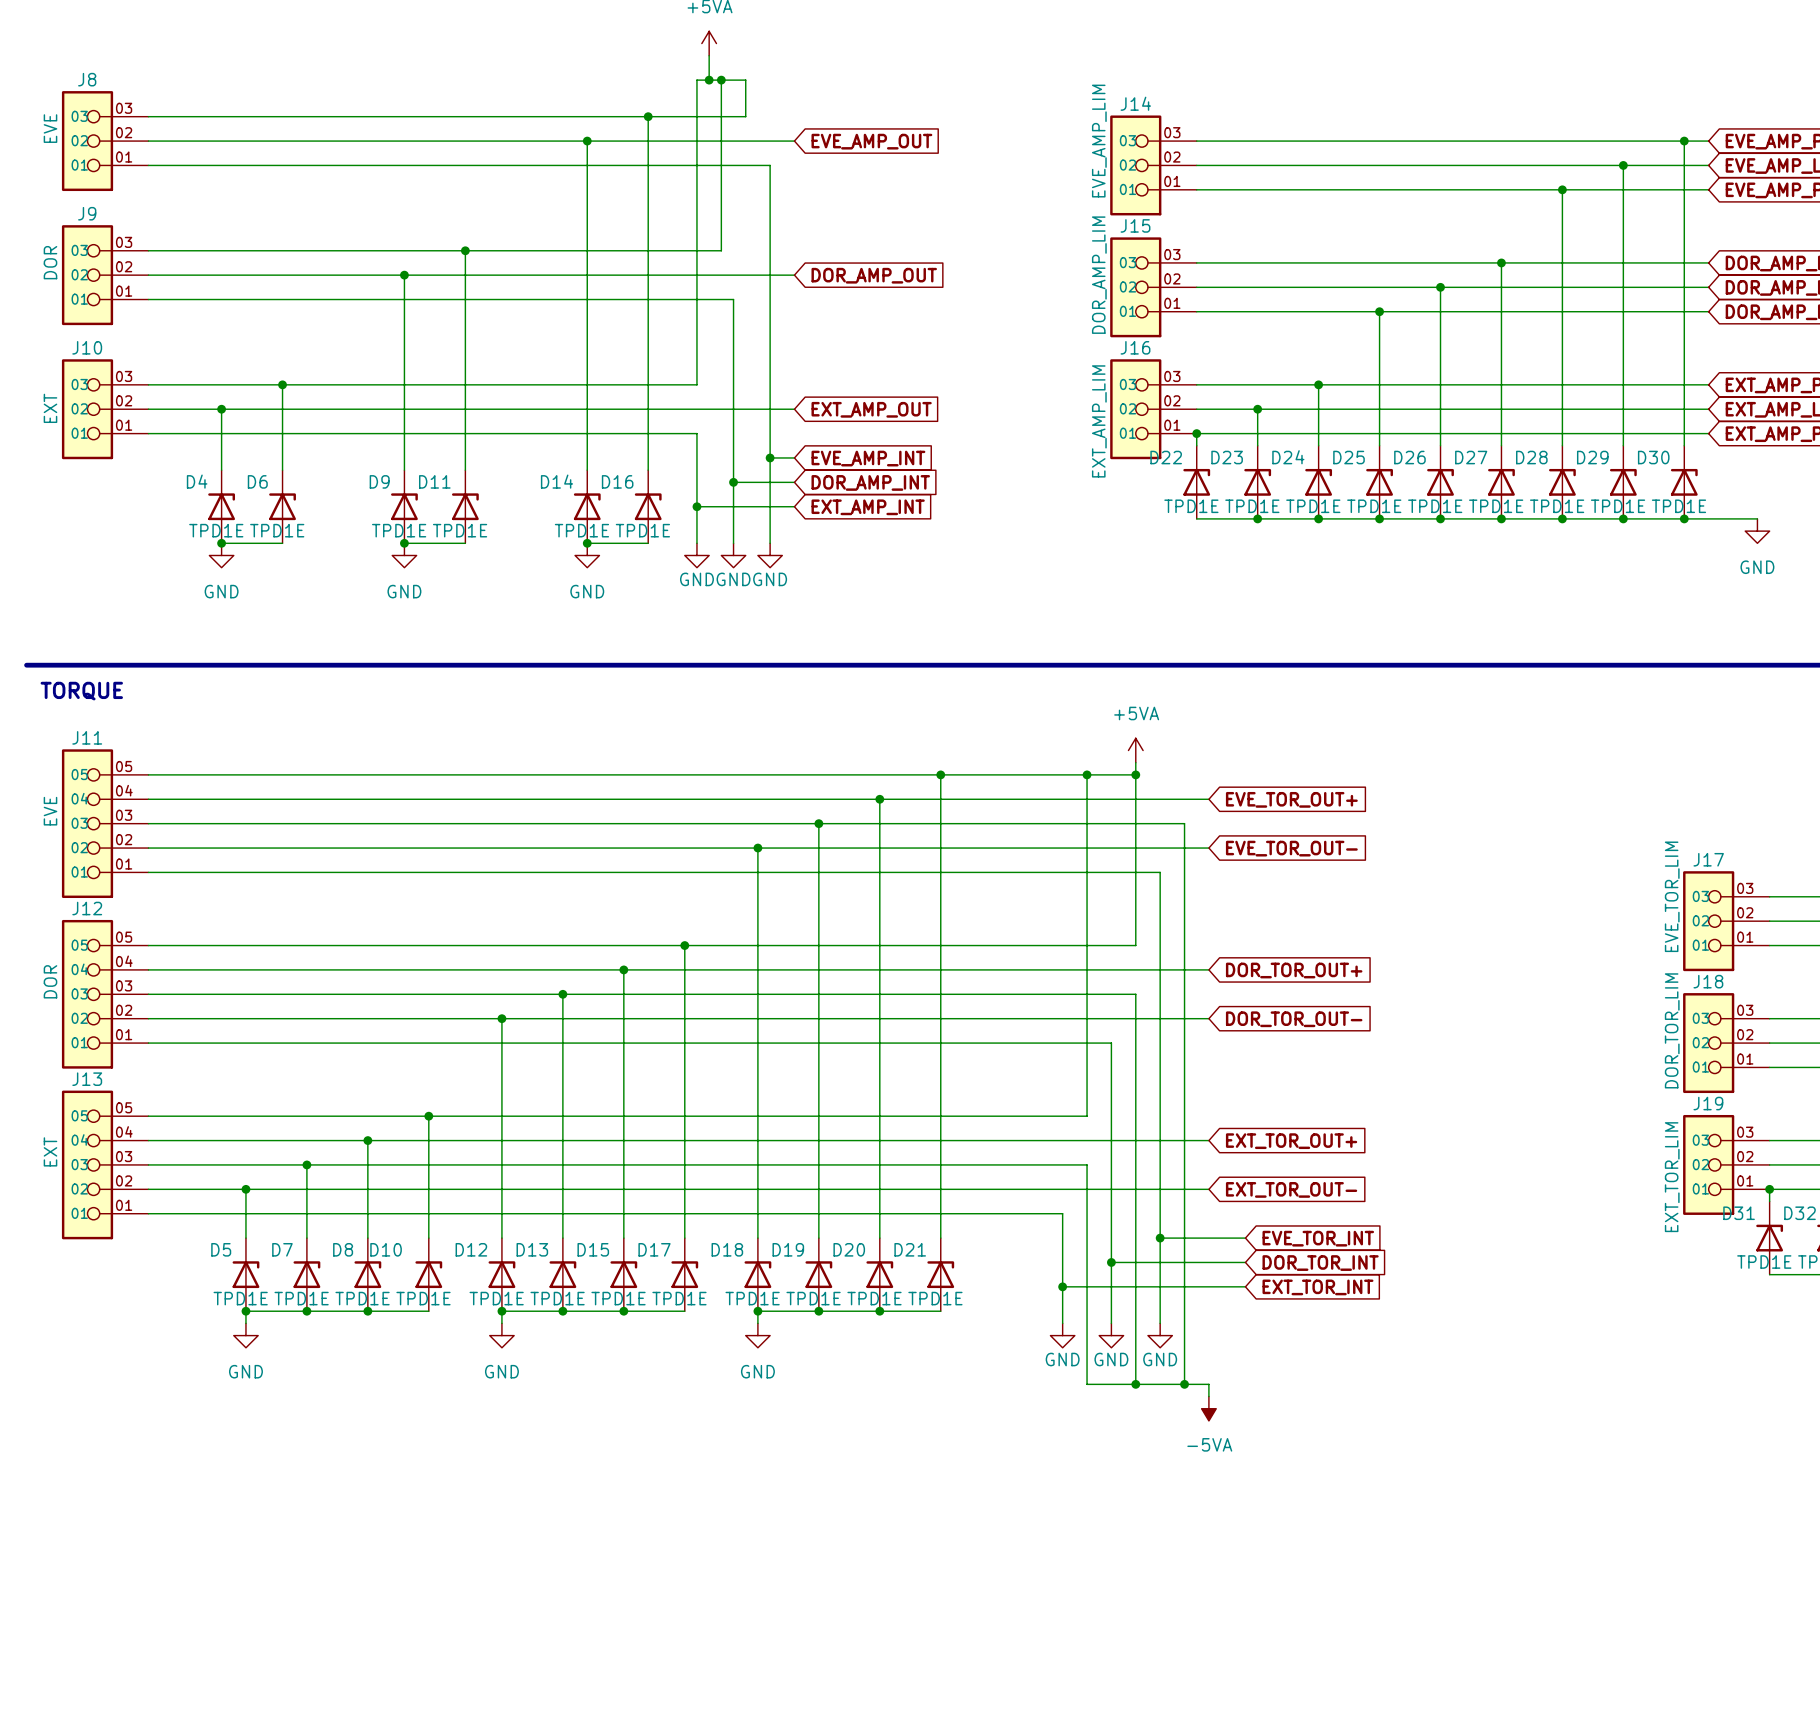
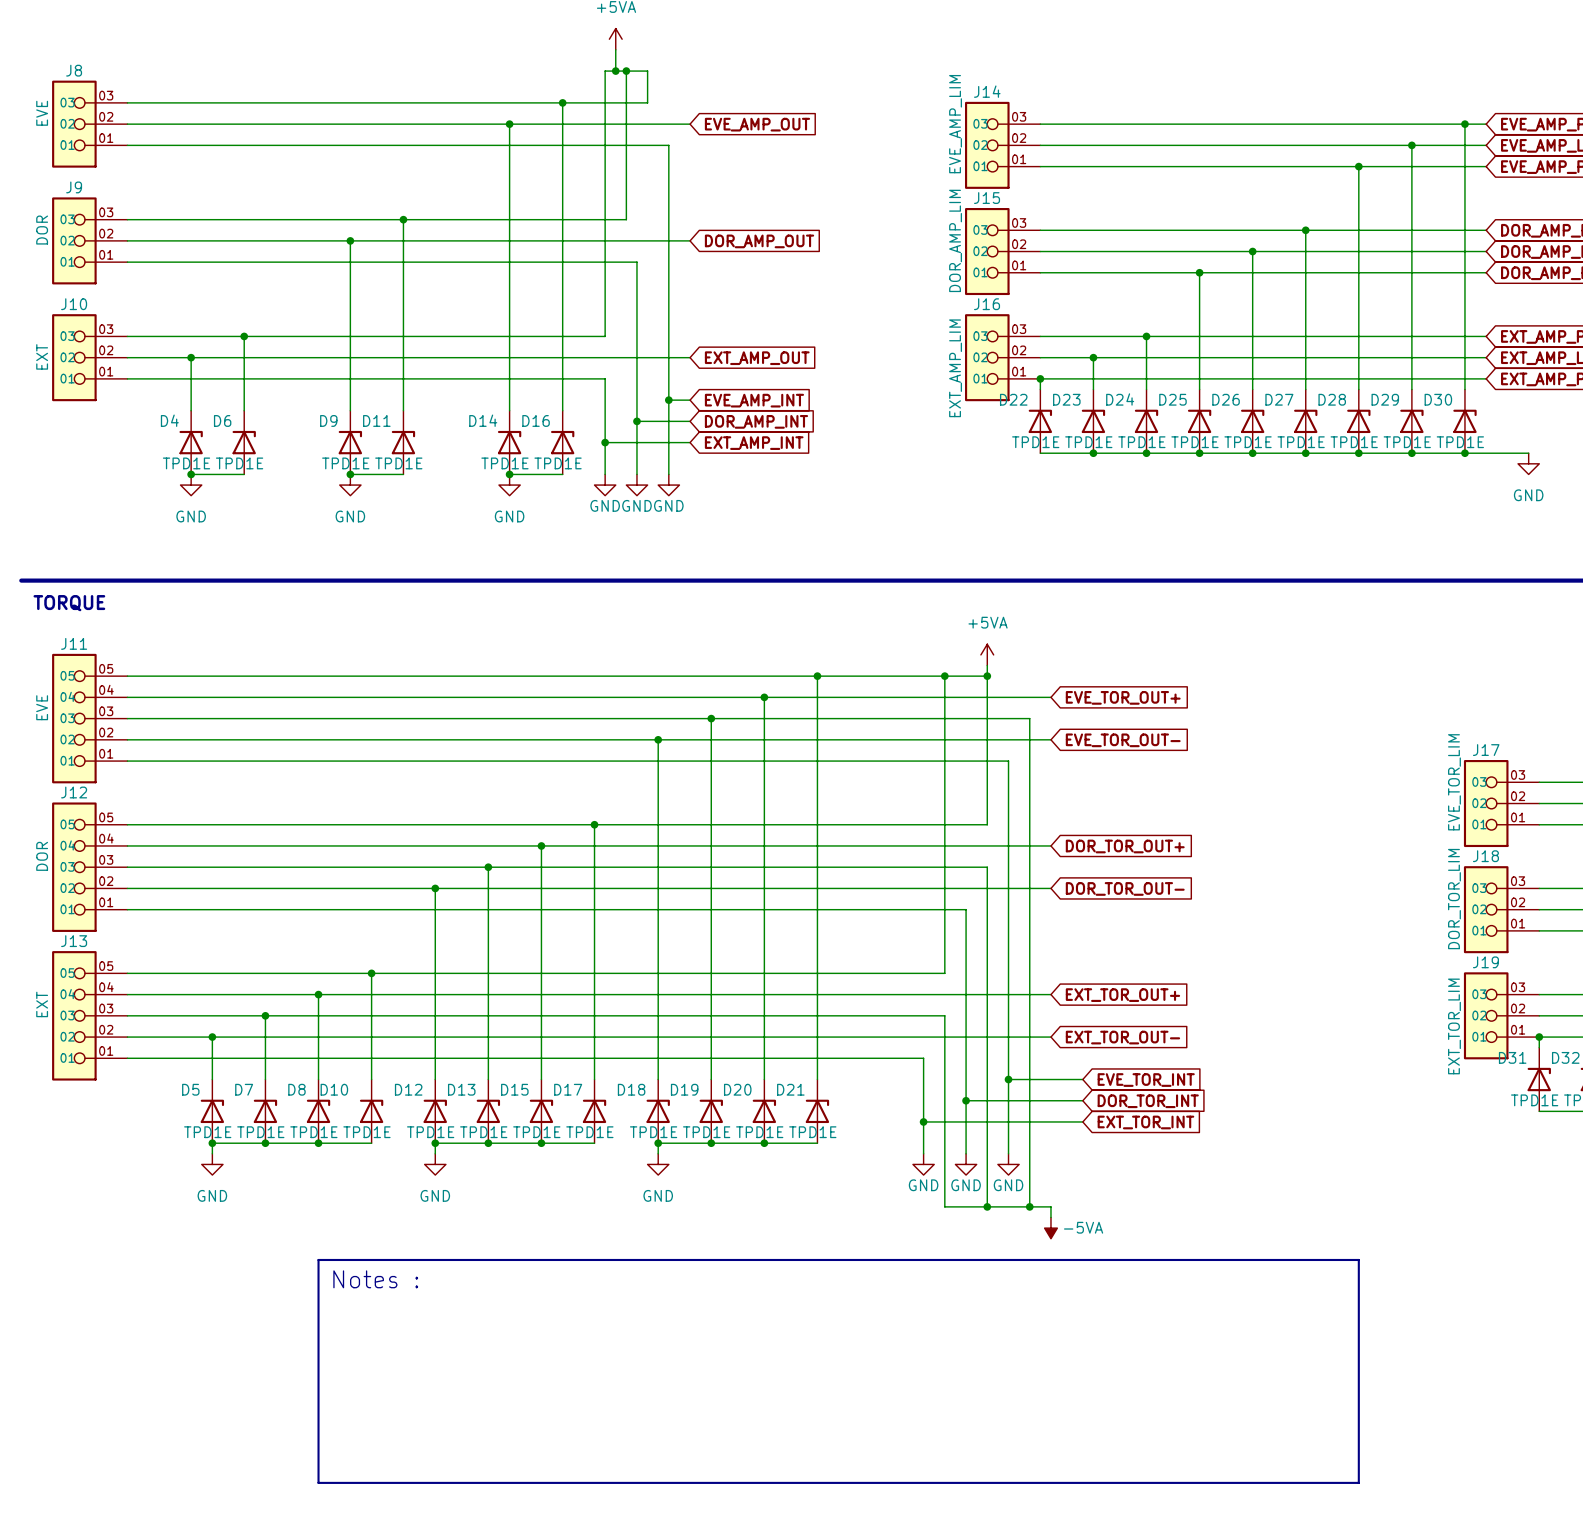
power symbol text position: -5VA (1209, 1444) -> -5VA (1083, 1227)
line: none -> (318, 1259) (318, 1482) (1358, 1482) (1358, 1259) (318, 1259)
text: none -> Notes : (375, 1279)

